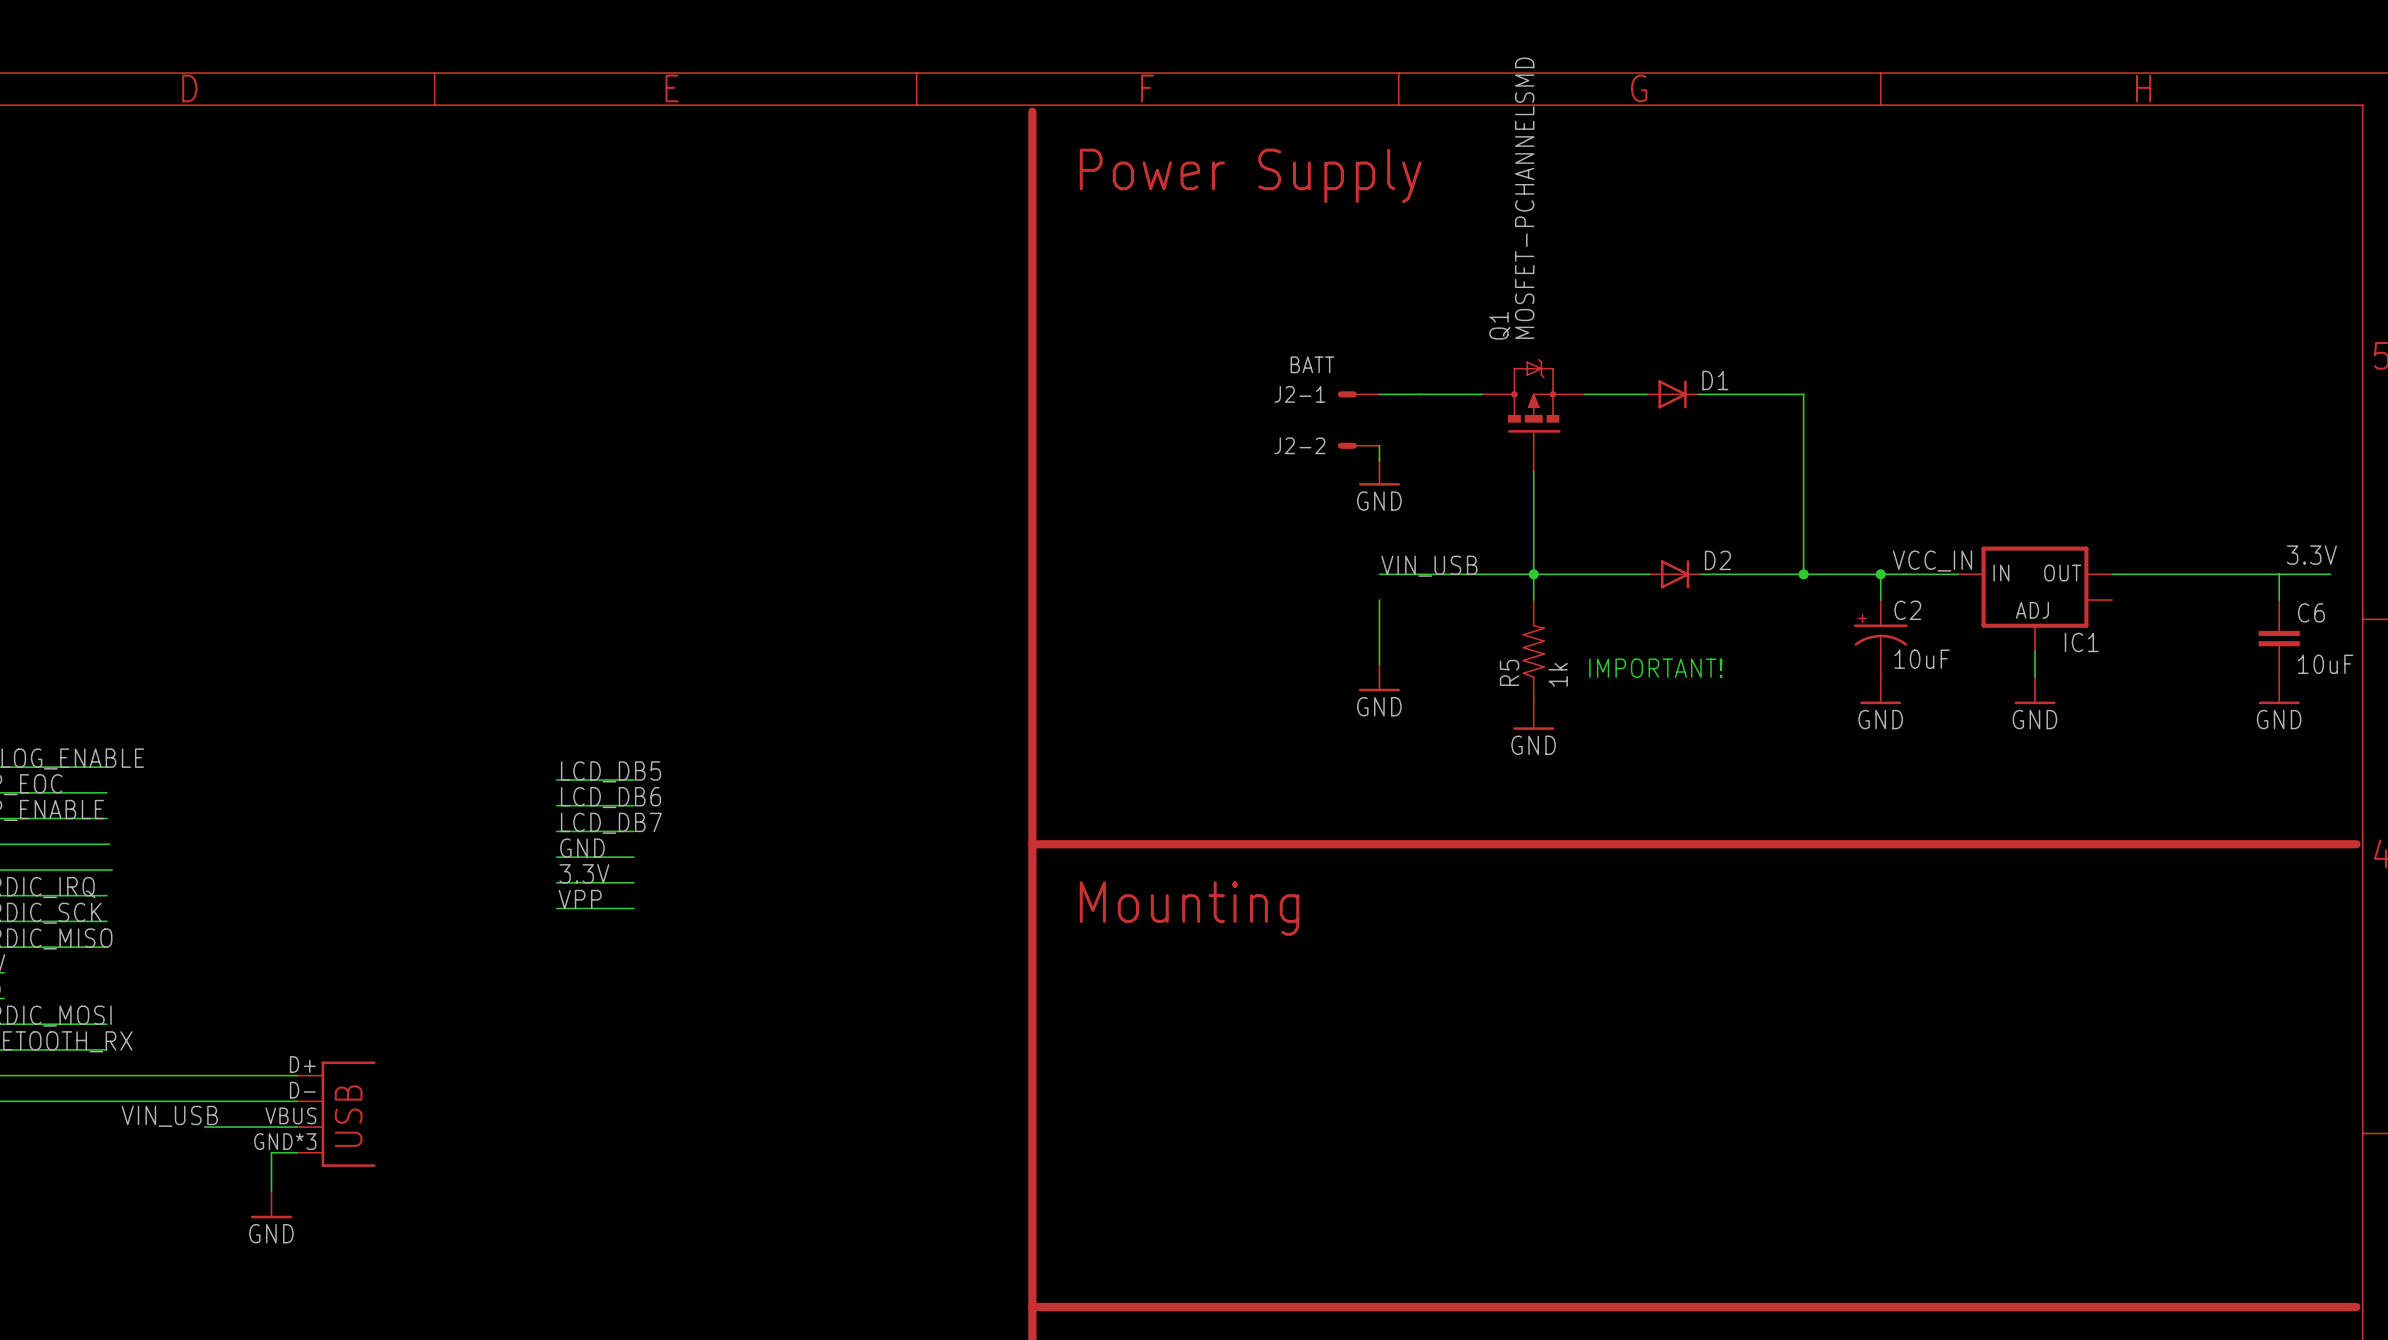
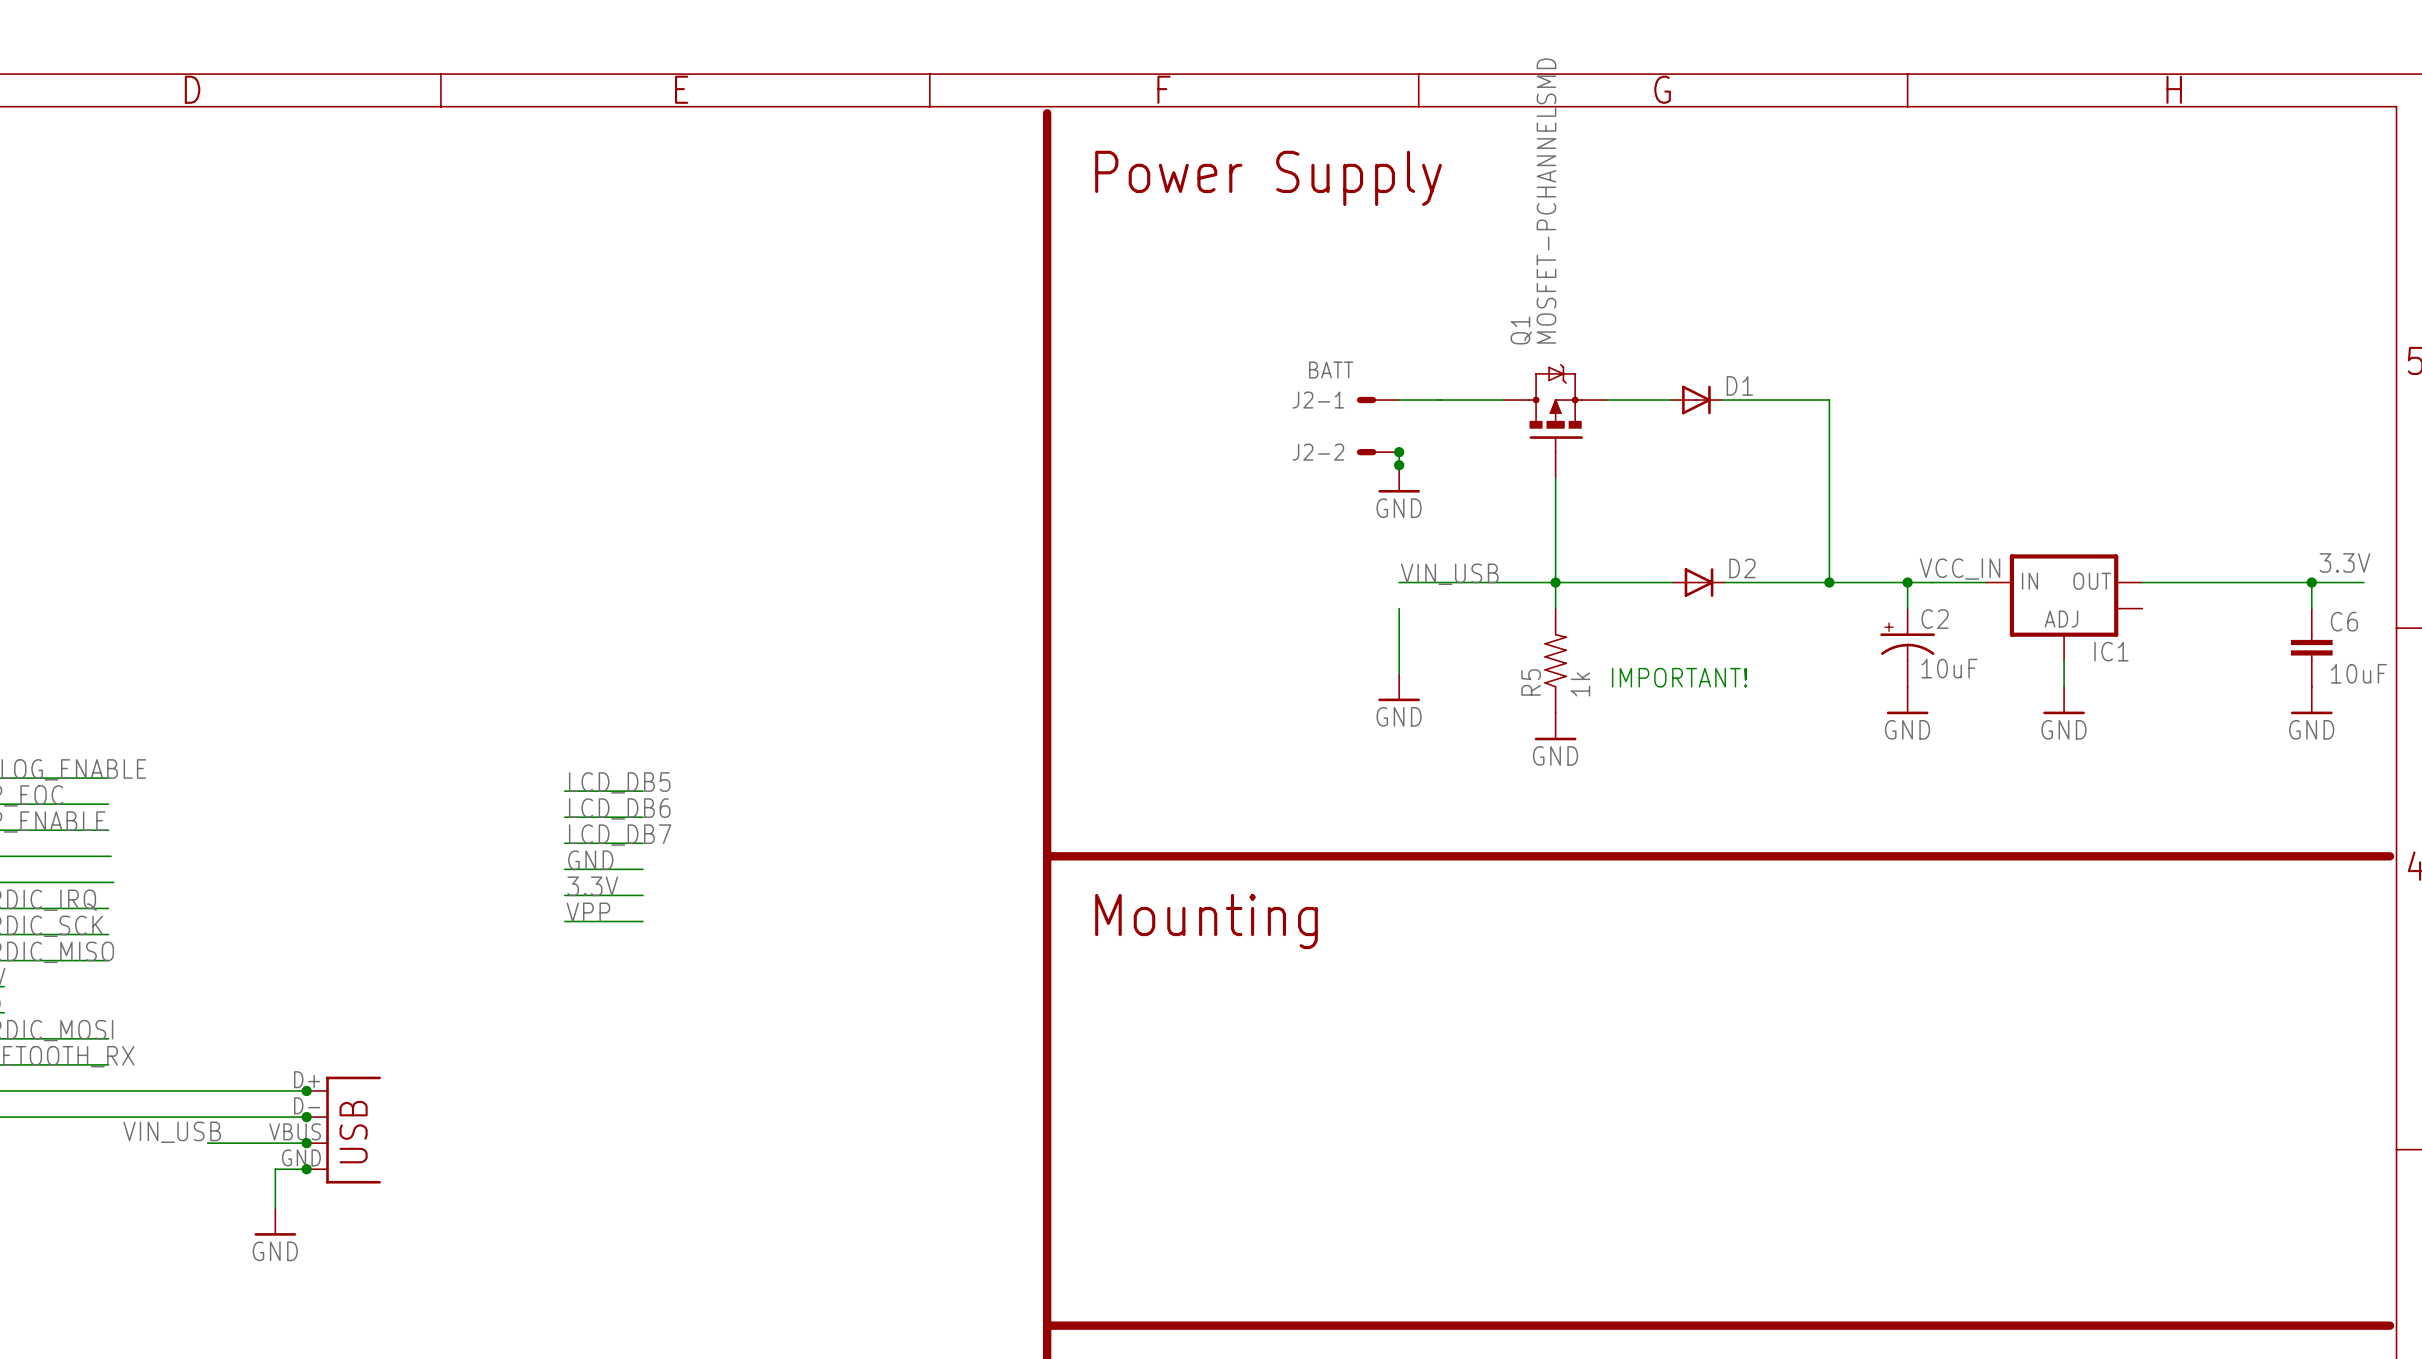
junction: none -> (1399, 452)
junction: none -> (1399, 465)
junction: none -> (2311, 582)
junction: none -> (306, 1090)
junction: none -> (306, 1117)
junction: none -> (306, 1143)
part pin number: GND*3 (285, 1141) -> GND (301, 1157)
junction: none -> (306, 1169)

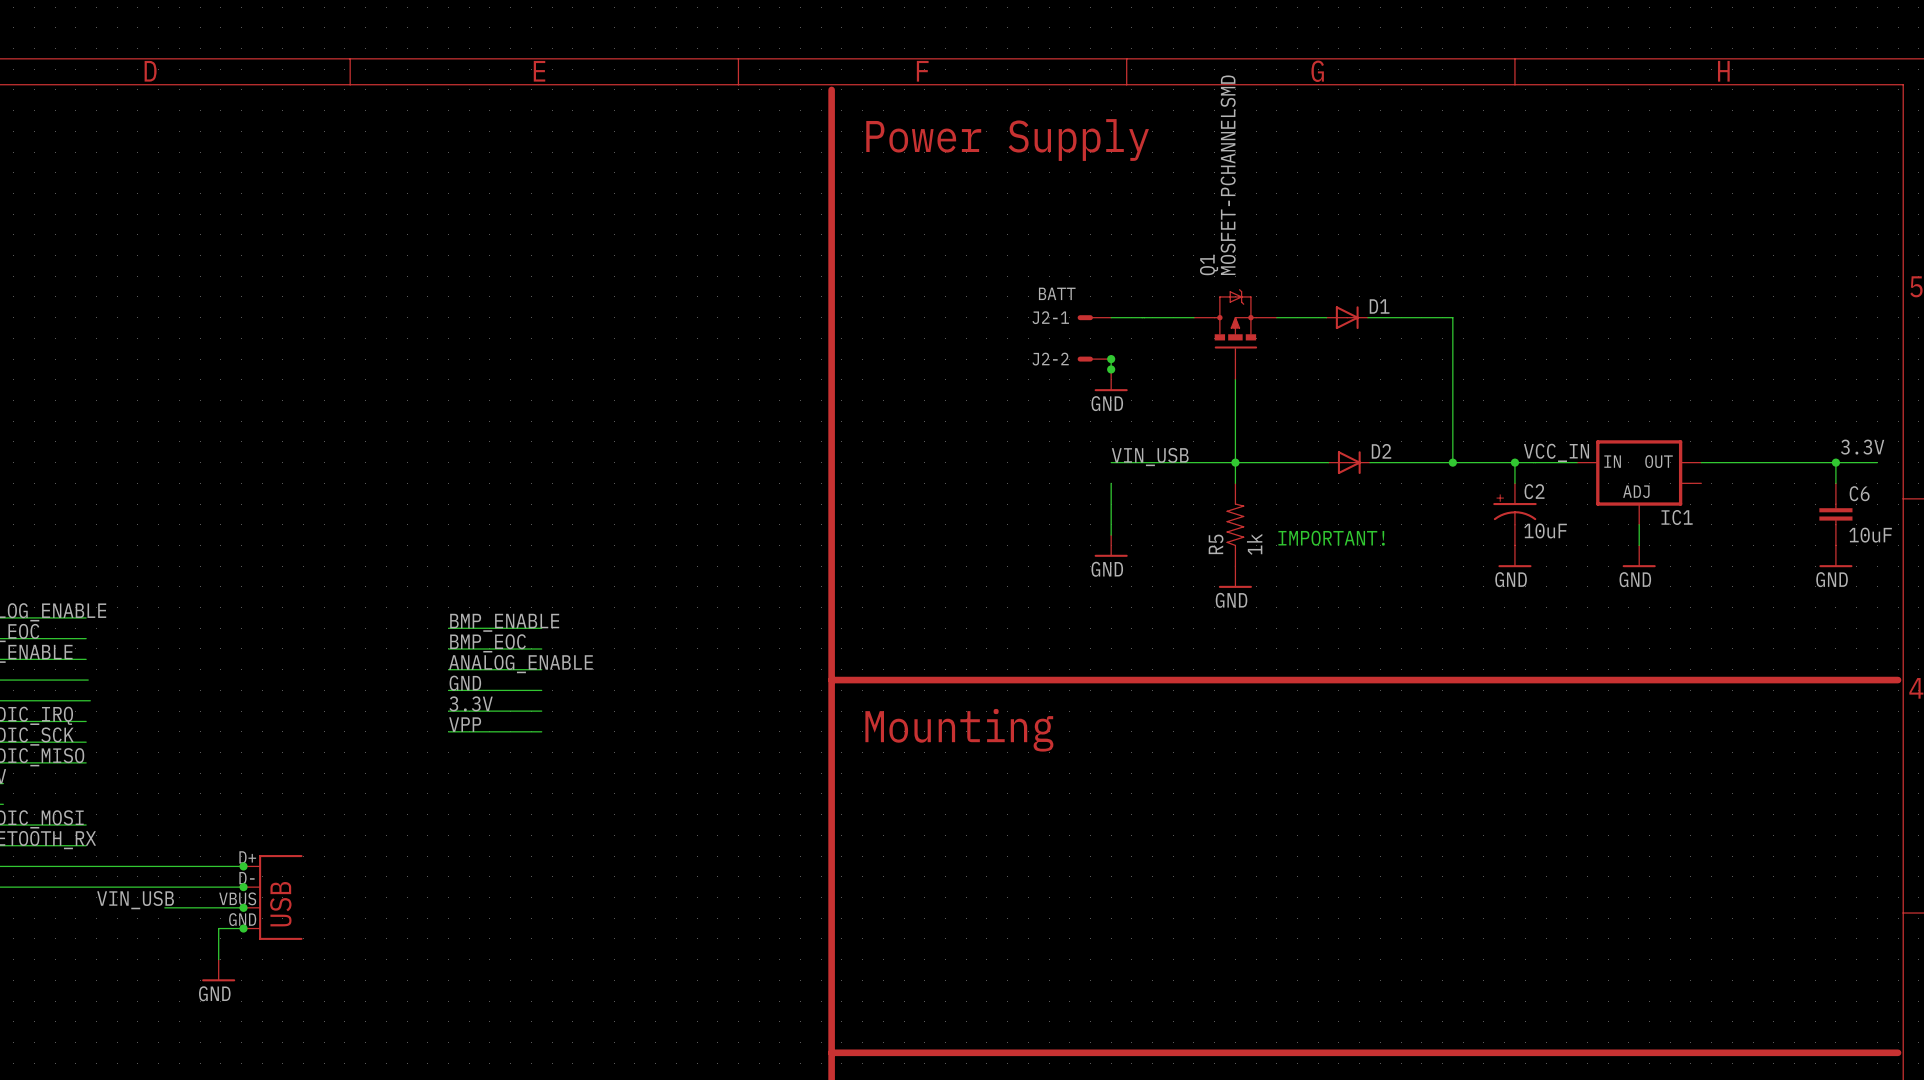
label: LCD_DB5 (619, 782) -> BMP_ENABLE (504, 622)
wire: none -> (510, 628) (541, 628)
label: LCD_DB6 (619, 808) -> BMP_EOC (488, 643)
wire: none -> (510, 648) (541, 648)
label: LCD_DB7 (620, 835) -> ANALOG_ENABLE (520, 664)
wire: none -> (510, 669) (541, 669)
wire: none -> (510, 690) (541, 690)
wire: none -> (510, 711) (541, 711)
wire: none -> (510, 731) (541, 731)

